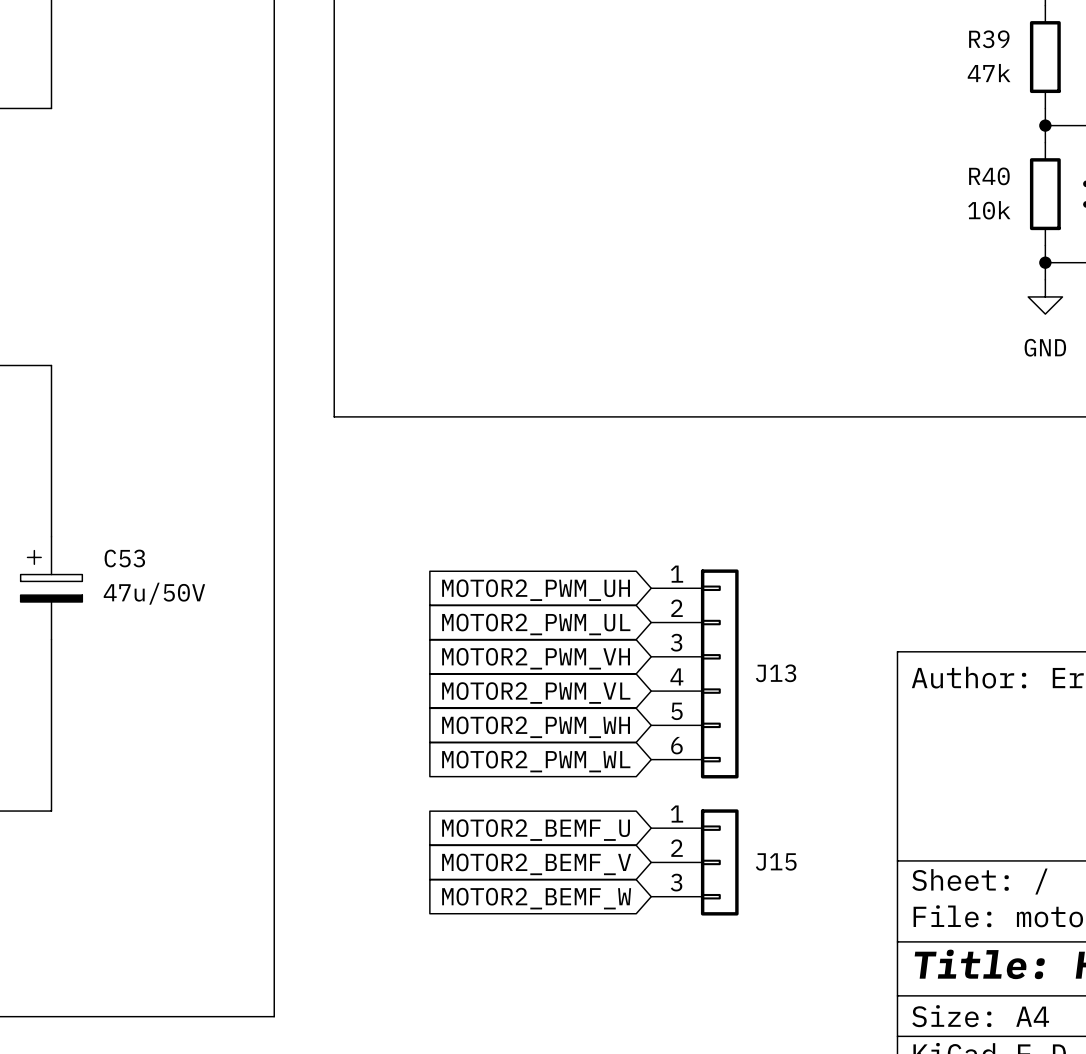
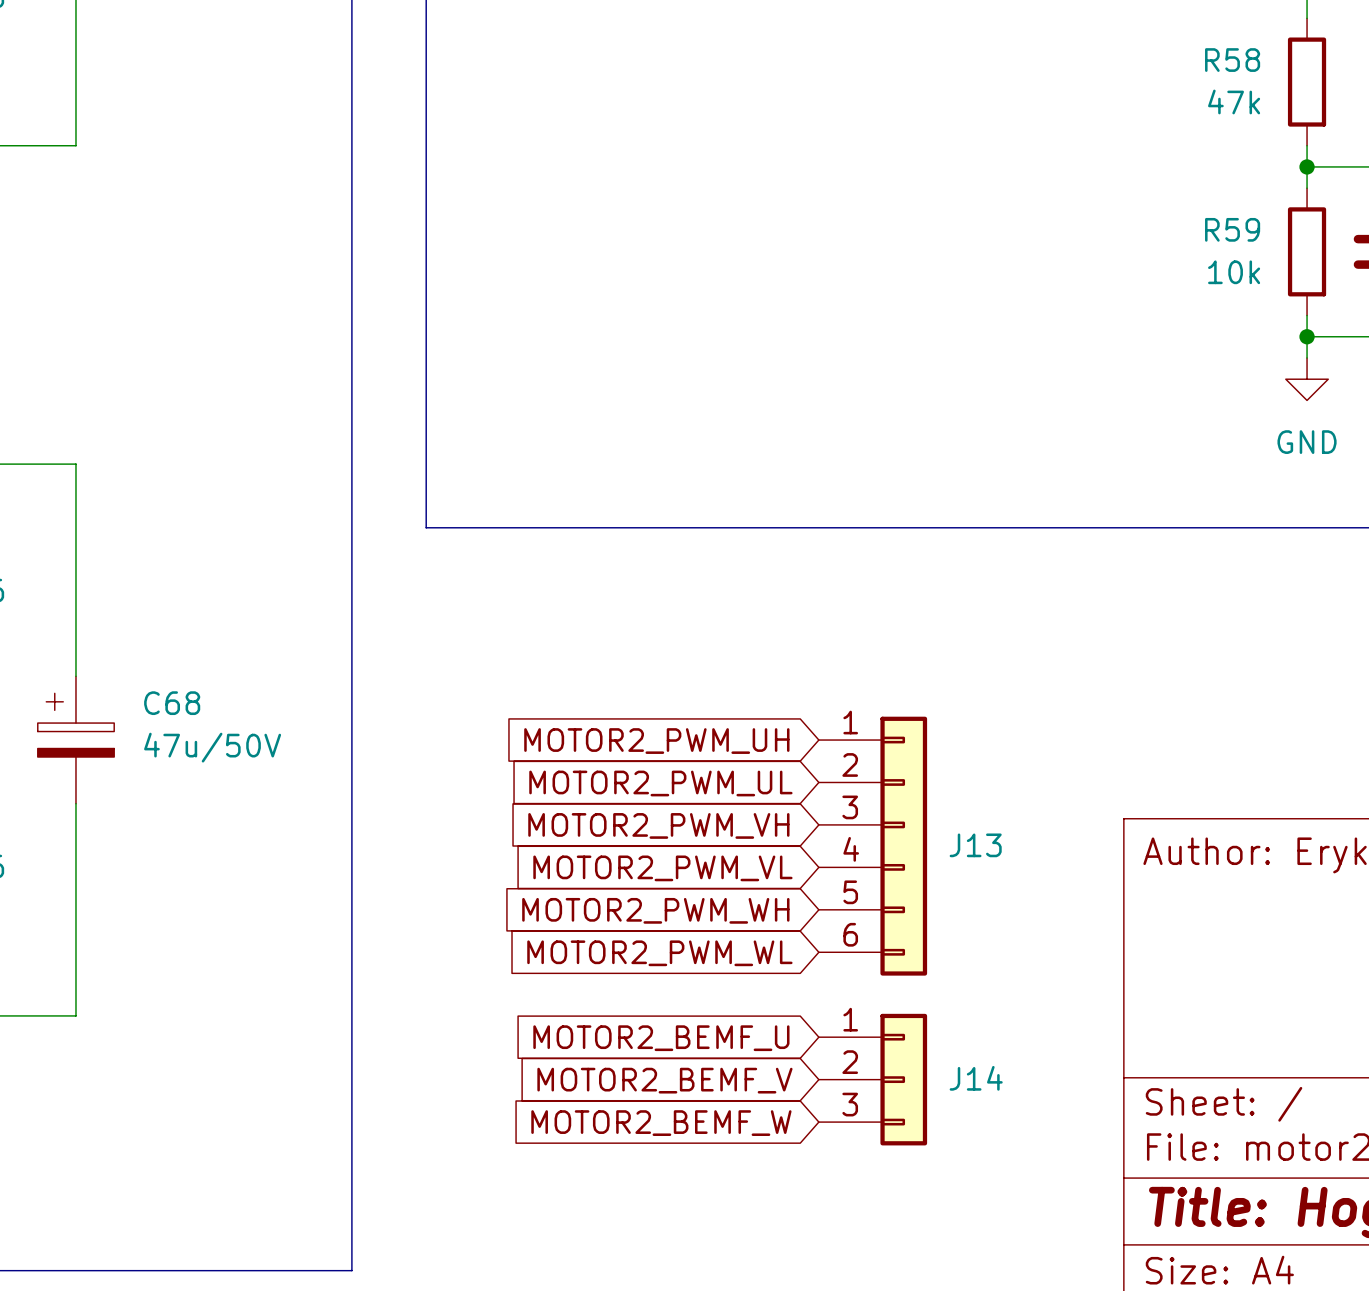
R39 name: R39 (989, 39) -> R58 (1232, 60)
R40 name: R40 (989, 176) -> R59 (1232, 229)
C53 name: C53 (124, 558) -> C68 (172, 703)
J15 name: J15 (776, 861) -> J14 (976, 1078)

